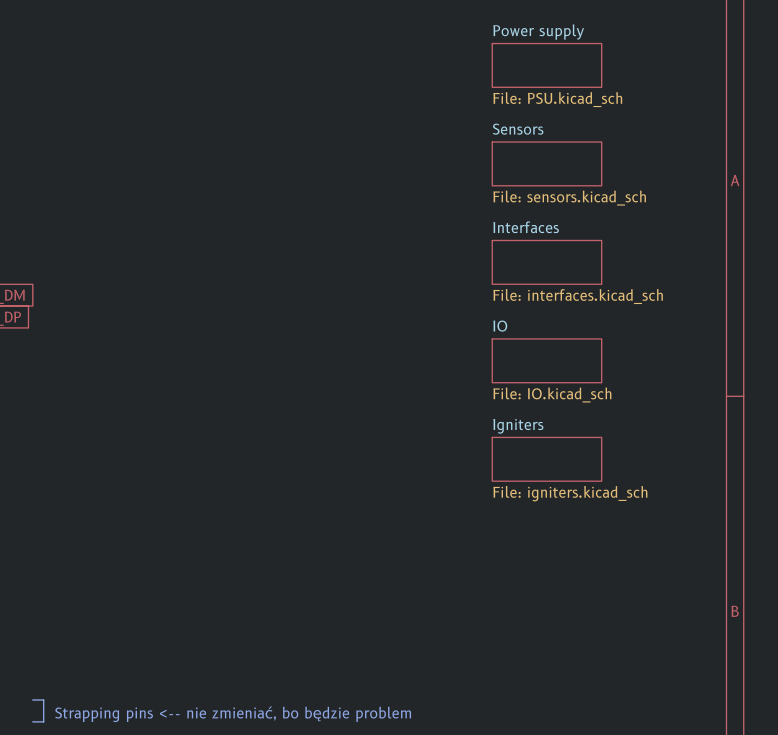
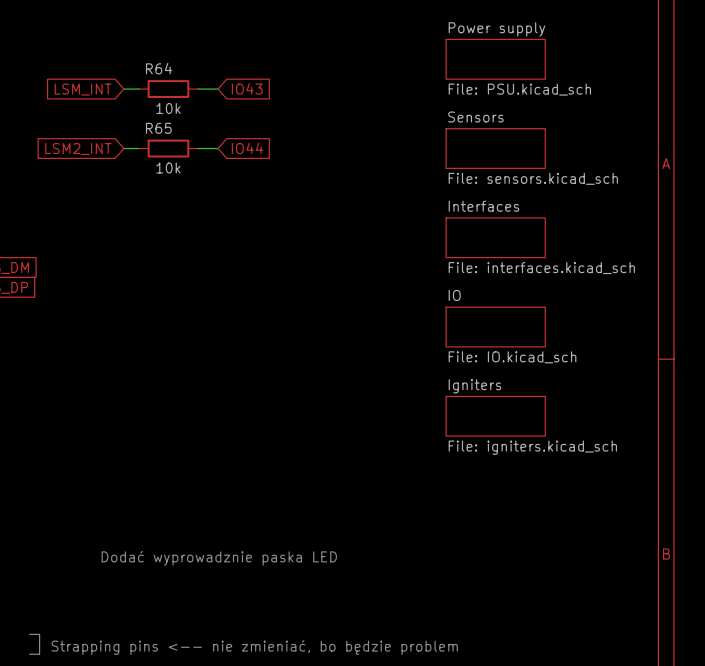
wire: none -> (123, 89) (138, 89)
R64: none -> 10k (168, 89)
wire: none -> (198, 89) (218, 89)
global label: none -> IO43 (247, 88)
global label: none -> LSM_INT (83, 89)
wire: none -> (123, 148) (138, 148)
R65: none -> 10k (168, 148)
wire: none -> (198, 148) (218, 148)
global label: none -> IO44 (247, 148)
global label: none -> LSM2_INT (78, 149)
text: none -> Dodać wyprowadznie paska LED (219, 558)

